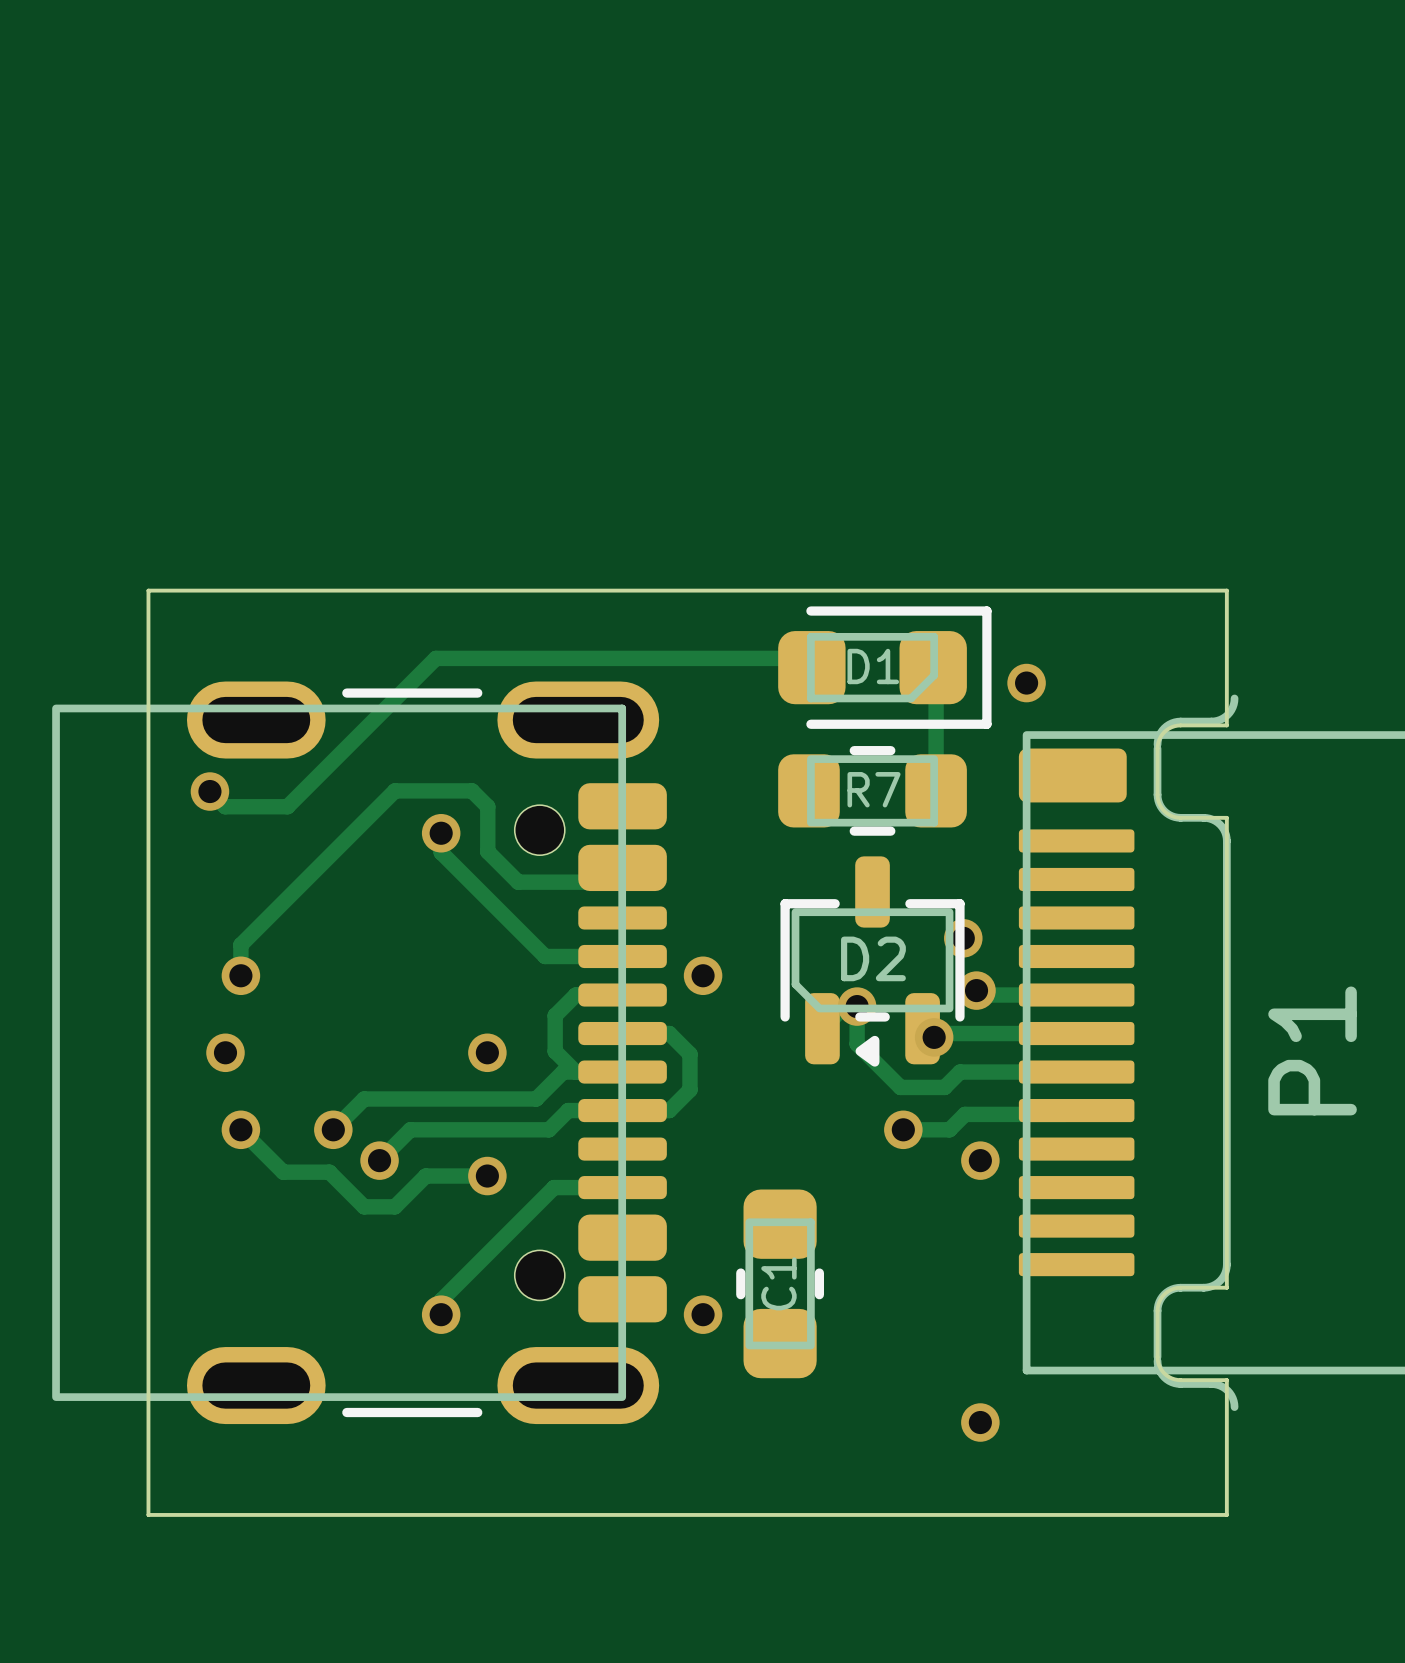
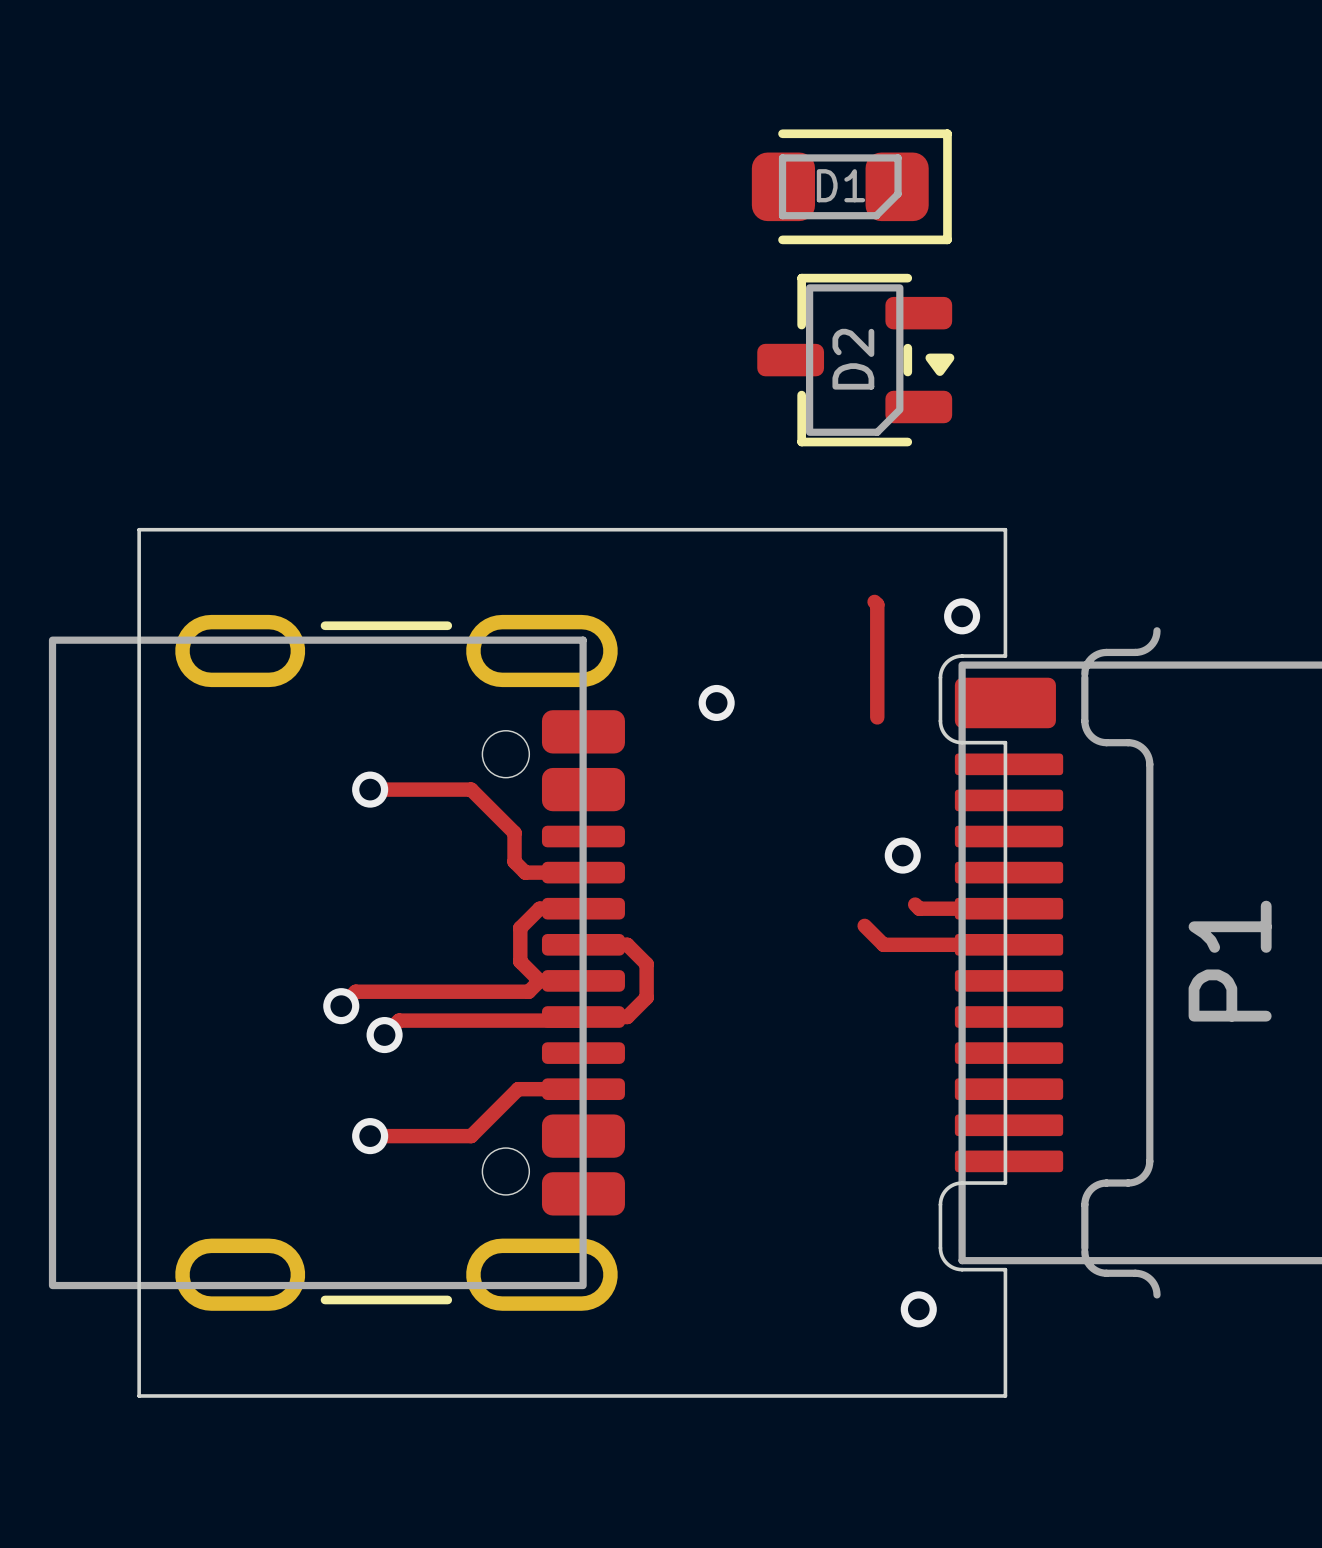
board edge: (1072, 590) (1226, 590) (1226, 725) (1174, 726) (1162, 734) (1157, 748) (1157, 797) (1164, 811) (1177, 817) (1226, 817) (1226, 1287) (1174, 1288) (1162, 1296) (1157, 1310) (1157, 1360) (1164, 1373) (1177, 1379) (1226, 1380) (1226, 1514) (1072, 1514) -> (1005, 529) (1005, 656) (956, 656) (944, 664) (940, 677) (940, 723) (946, 736) (959, 742) (1005, 742) (1005, 1183) (956, 1183) (944, 1191) (940, 1204) (940, 1250) (946, 1263) (959, 1269) (1005, 1269) (1005, 1395)
track: (811, 667) (802, 658) (435, 658) (287, 806) (225, 806) (209, 791) -> none
D1 position: (884, 667) -> (851, 186)
via: none -> (716, 702)
R7: (872, 790) -> none
via: (209, 791) -> none
track: (441, 833) (441, 852) (545, 956) (560, 956) -> (370, 789) (471, 789) (514, 832) (514, 861) (525, 872)
via position: (441, 833) -> (370, 789)
track: (622, 867) (608, 882) (518, 882) (487, 851) (487, 806) (471, 790) (394, 790) (240, 944) (240, 975) -> none
D2 rotation: 0° (872, 961) -> 90° counterclockwise (855, 360)
D2 position: (872, 961) -> (855, 360)
via: (240, 975) -> none
via: (703, 975) -> none
via: (976, 990) -> none
via: (857, 1006) -> none
track: (822, 1028) (844, 1006) (857, 1006) (857, 1044) (900, 1087) (944, 1087) (960, 1072) (1068, 1072) -> none
via: (934, 1037) -> none
via: (225, 1052) -> none
via: (487, 1052) -> none
track: (575, 1072) (563, 1072) (536, 1099) (364, 1099) (333, 1129) -> (539, 980) (528, 991) (355, 991) (341, 1006)
track: (622, 1110) (568, 1110) (549, 1129) (410, 1129) (379, 1160) -> (583, 1016) (579, 1020) (399, 1020) (384, 1035)
track: (1068, 1110) (1065, 1114) (964, 1114) (949, 1129) (903, 1129) -> none
track: (240, 1129) (283, 1172) (329, 1172) (364, 1206) (394, 1206) (425, 1176) (487, 1176) -> none
via: (240, 1129) -> none
via position: (333, 1129) -> (341, 1006)
via: (903, 1129) -> none
via position: (379, 1160) -> (384, 1035)
via: (980, 1160) -> none
via: (487, 1176) -> none
track: (554, 1187) (441, 1300) (441, 1314) -> (518, 1089) (471, 1136) (370, 1136)
via: none -> (370, 1136)
C1: (780, 1283) -> none
via: (441, 1314) -> none
via: (703, 1314) -> none

